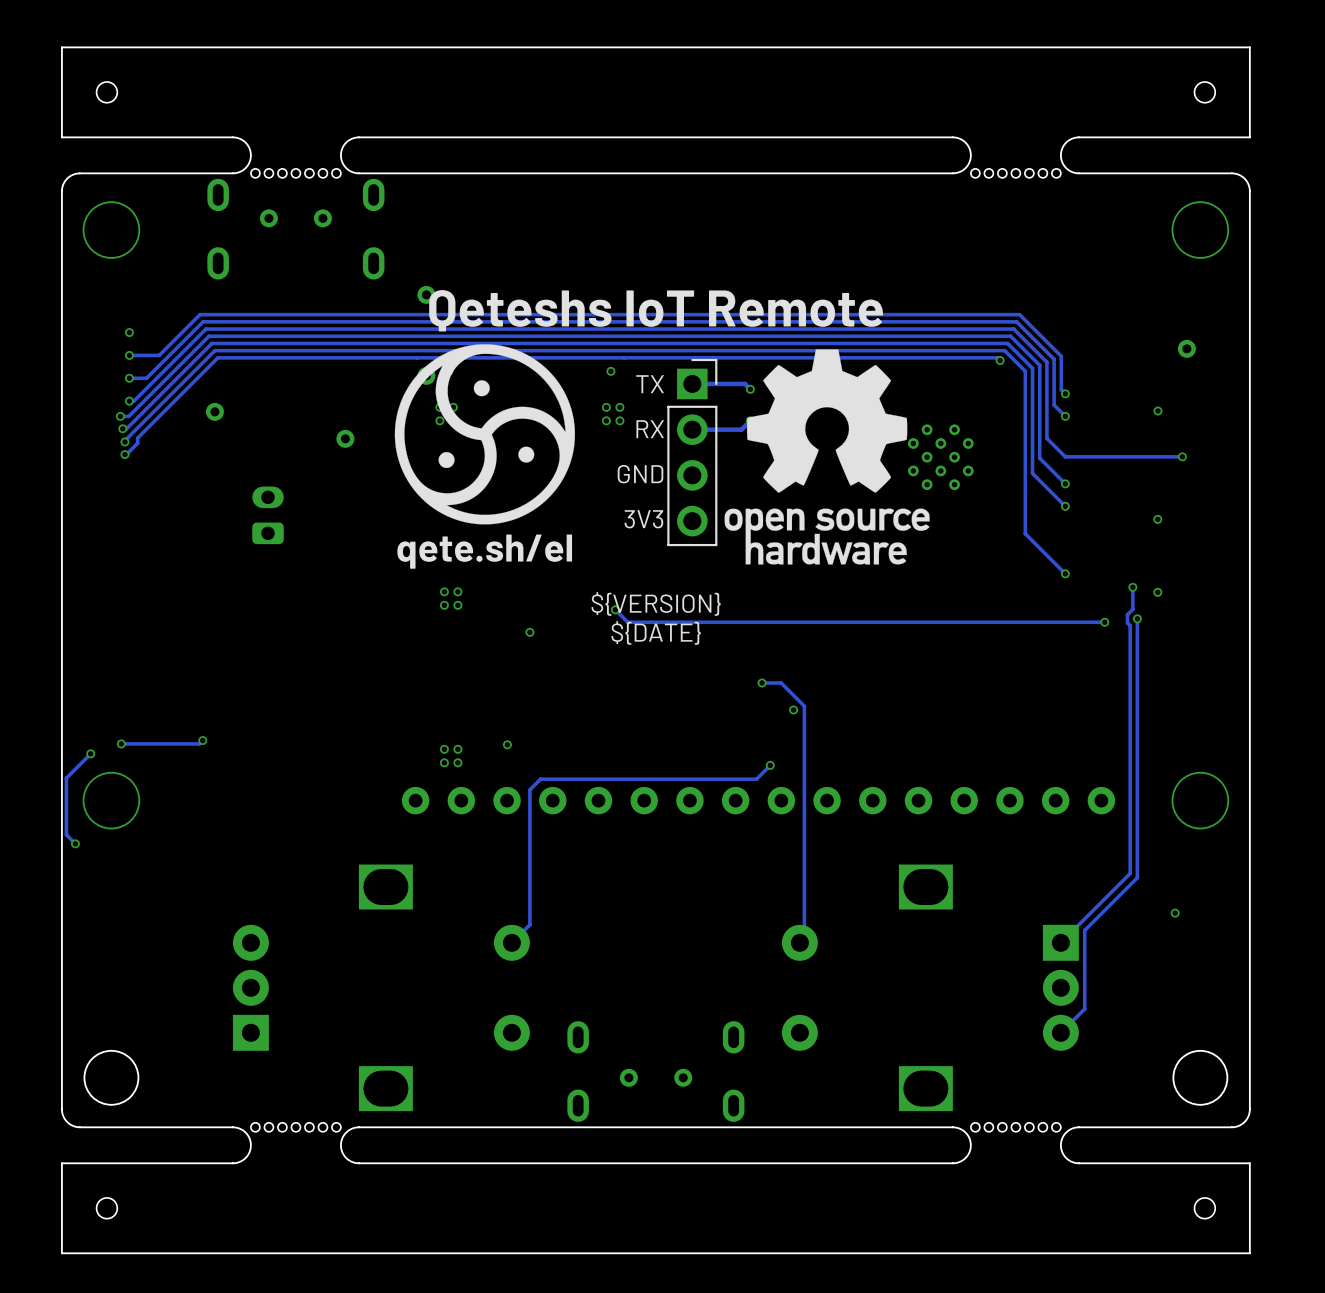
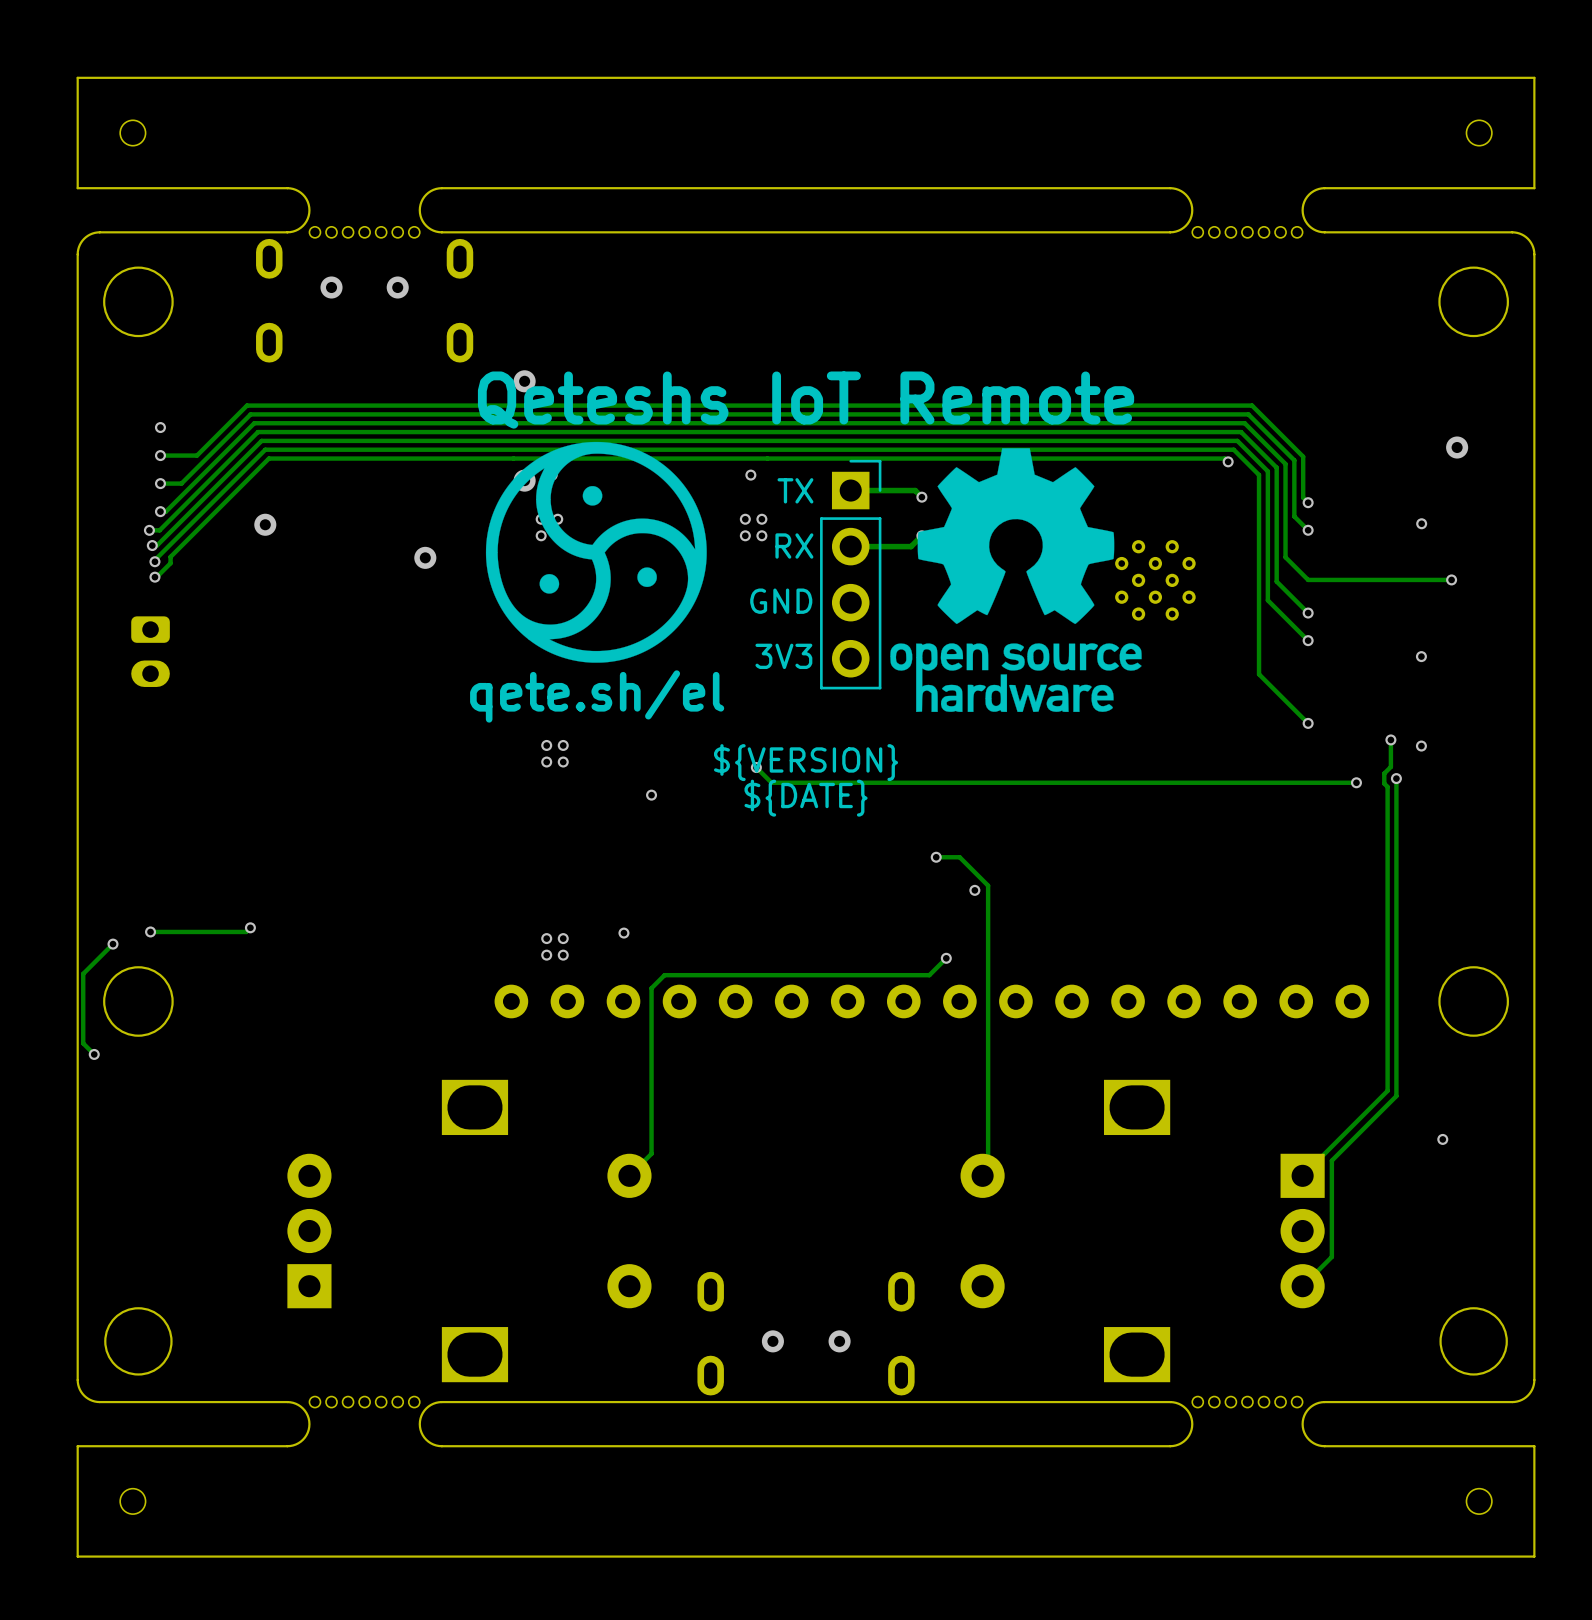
part rotation: 0° (268, 515) -> 180° (150, 651)
part position: (268, 515) -> (150, 651)

